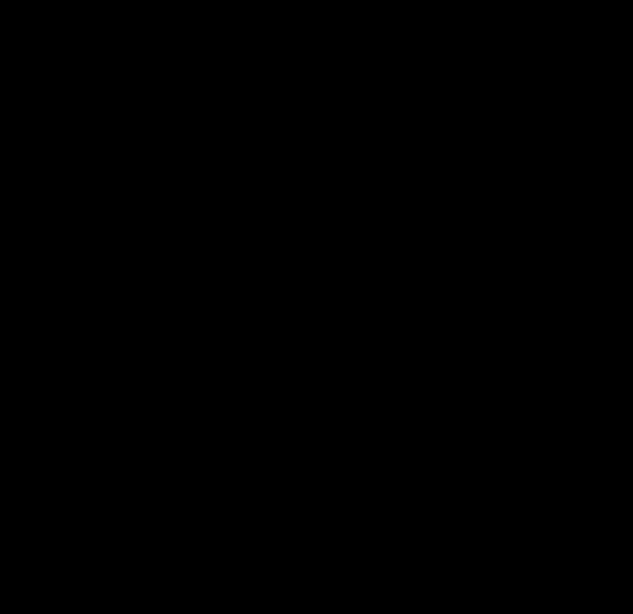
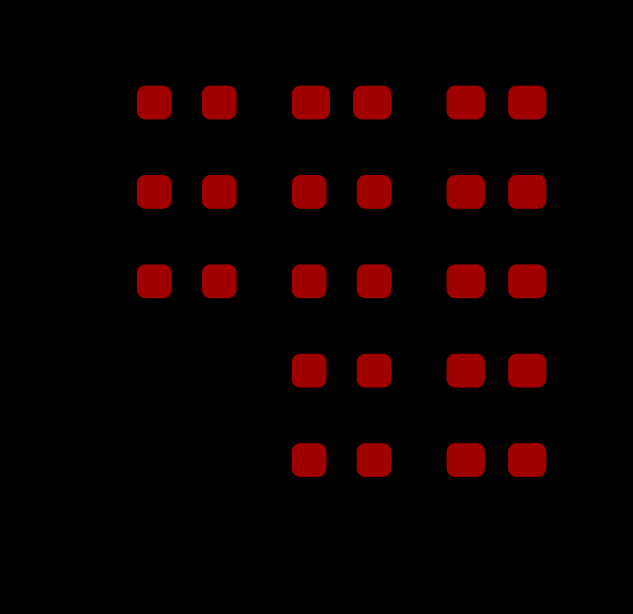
part: none -> (186, 102)
part: none -> (341, 102)
part: none -> (496, 102)
part: none -> (186, 191)
part: none -> (341, 191)
part: none -> (496, 191)
part: none -> (186, 281)
part: none -> (341, 281)
part: none -> (496, 281)
part: none -> (341, 370)
part: none -> (496, 370)
part: none -> (341, 460)
part: none -> (496, 460)

